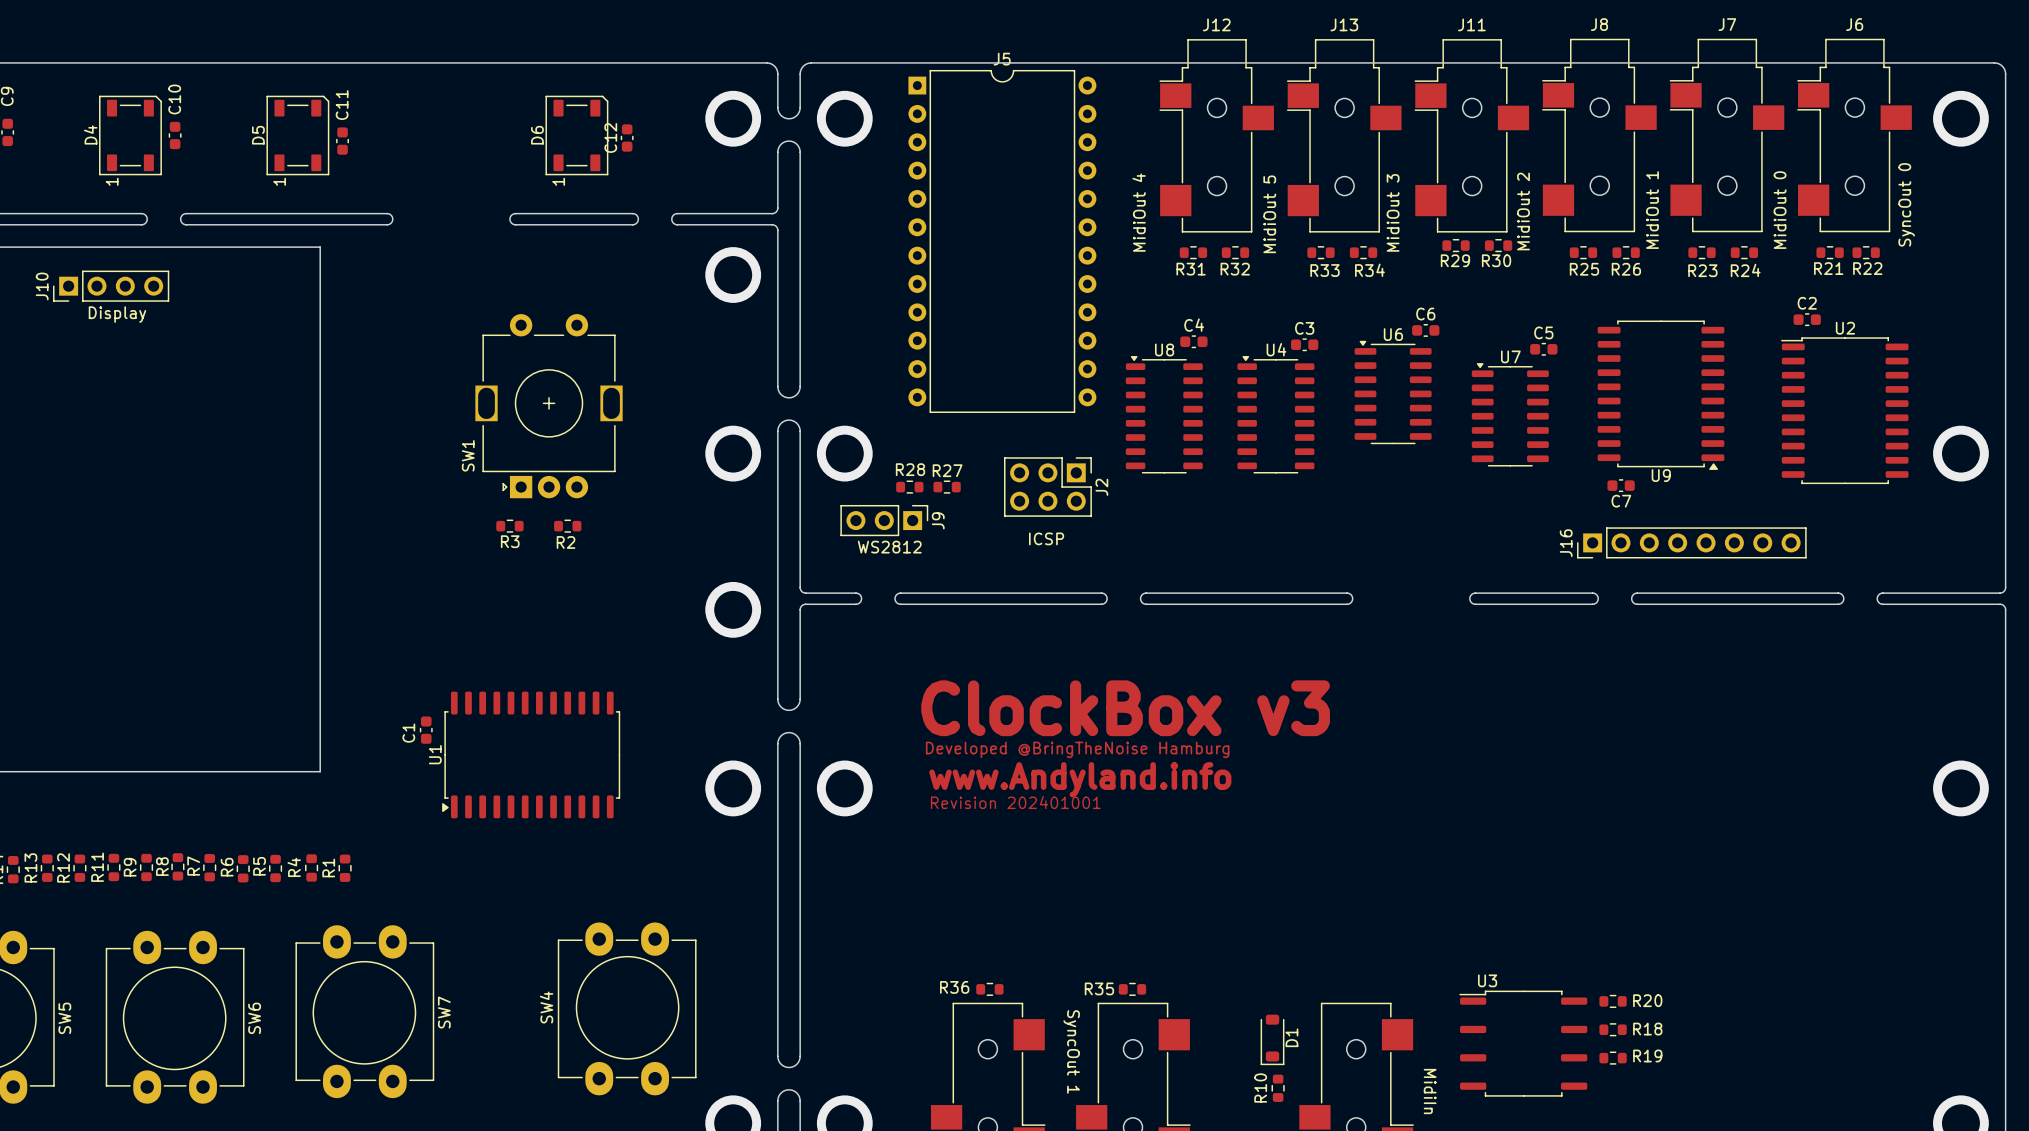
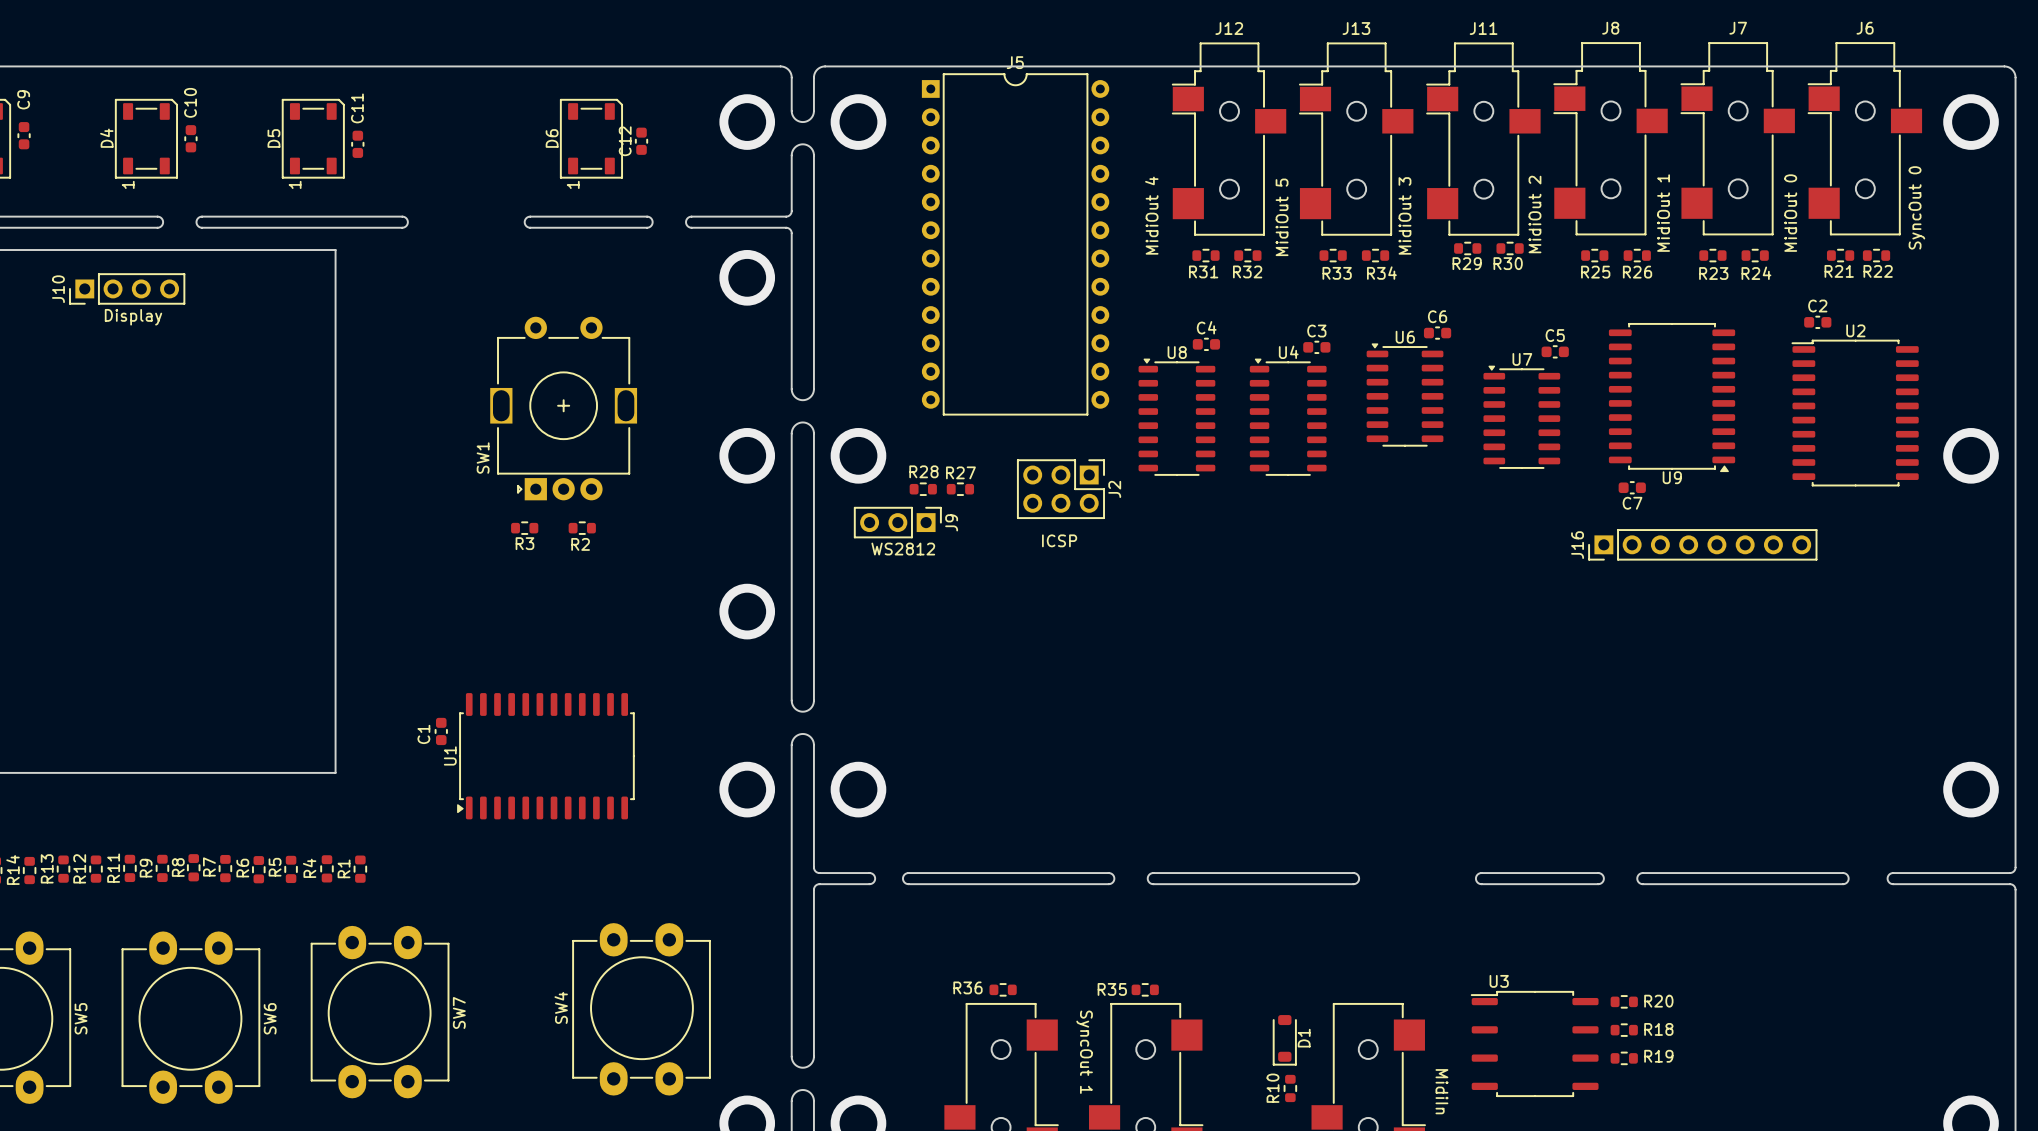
board edge: (800, 587) (805, 593) (856, 593) (861, 598) (856, 604) (805, 604) (800, 609) -> (813, 589) (813, 611)
board edge: (2005, 587) (2003, 591) (2000, 593) (1882, 593) (1877, 598) (1882, 604) (2000, 604) (2003, 605) (2005, 609) -> (2015, 589) (2015, 611)
board edge: (900, 593) (1101, 593) (1105, 594) (1107, 598) (1105, 602) (1101, 604) (900, 604) (896, 602) (895, 598) (896, 594) (900, 593) -> none
board edge: (1146, 593) (1347, 593) (1351, 594) (1352, 598) (1351, 602) (1347, 604) (1146, 604) (1142, 602) (1140, 598) (1142, 594) (1146, 593) -> none
board edge: (1475, 593) (1592, 593) (1596, 594) (1598, 598) (1596, 602) (1592, 604) (1475, 604) (1471, 602) (1469, 598) (1471, 594) (1475, 593) -> none
board edge: (1637, 593) (1838, 593) (1842, 594) (1843, 598) (1842, 602) (1838, 604) (1637, 604) (1633, 602) (1631, 598) (1633, 594) (1637, 593) -> none
text: ClockBox v3 (1125, 708) -> none
text: Developed @BringTheNoise Hamburg (1077, 749) -> none
text: www.Andyland.info (1080, 779) -> none
text: Revision 202401001 (1015, 802) -> none
board edge: (800, 866) (800, 888) -> (813, 867) (818, 872) (870, 873) (875, 878) (870, 884) (818, 884) (813, 889)
board edge: (2005, 866) (2005, 888) -> (2015, 867) (2013, 871) (2009, 873) (1892, 873) (1887, 878) (1892, 884) (2009, 884) (2013, 885) (2015, 889)
board edge: none -> (908, 873) (1108, 873) (1112, 874) (1114, 878) (1112, 882) (1108, 884) (908, 884) (904, 882) (902, 878) (904, 874) (908, 873)
board edge: none -> (1153, 873) (1353, 873) (1357, 874) (1359, 878) (1357, 882) (1353, 884) (1153, 884) (1149, 882) (1147, 878) (1149, 874) (1153, 873)
board edge: none -> (1481, 873) (1598, 873) (1602, 874) (1603, 878) (1602, 882) (1598, 884) (1481, 884) (1477, 882) (1475, 878) (1477, 874) (1481, 873)
board edge: none -> (1642, 873) (1843, 873) (1847, 874) (1848, 878) (1847, 882) (1843, 884) (1642, 884) (1638, 882) (1637, 878) (1638, 874) (1642, 873)

